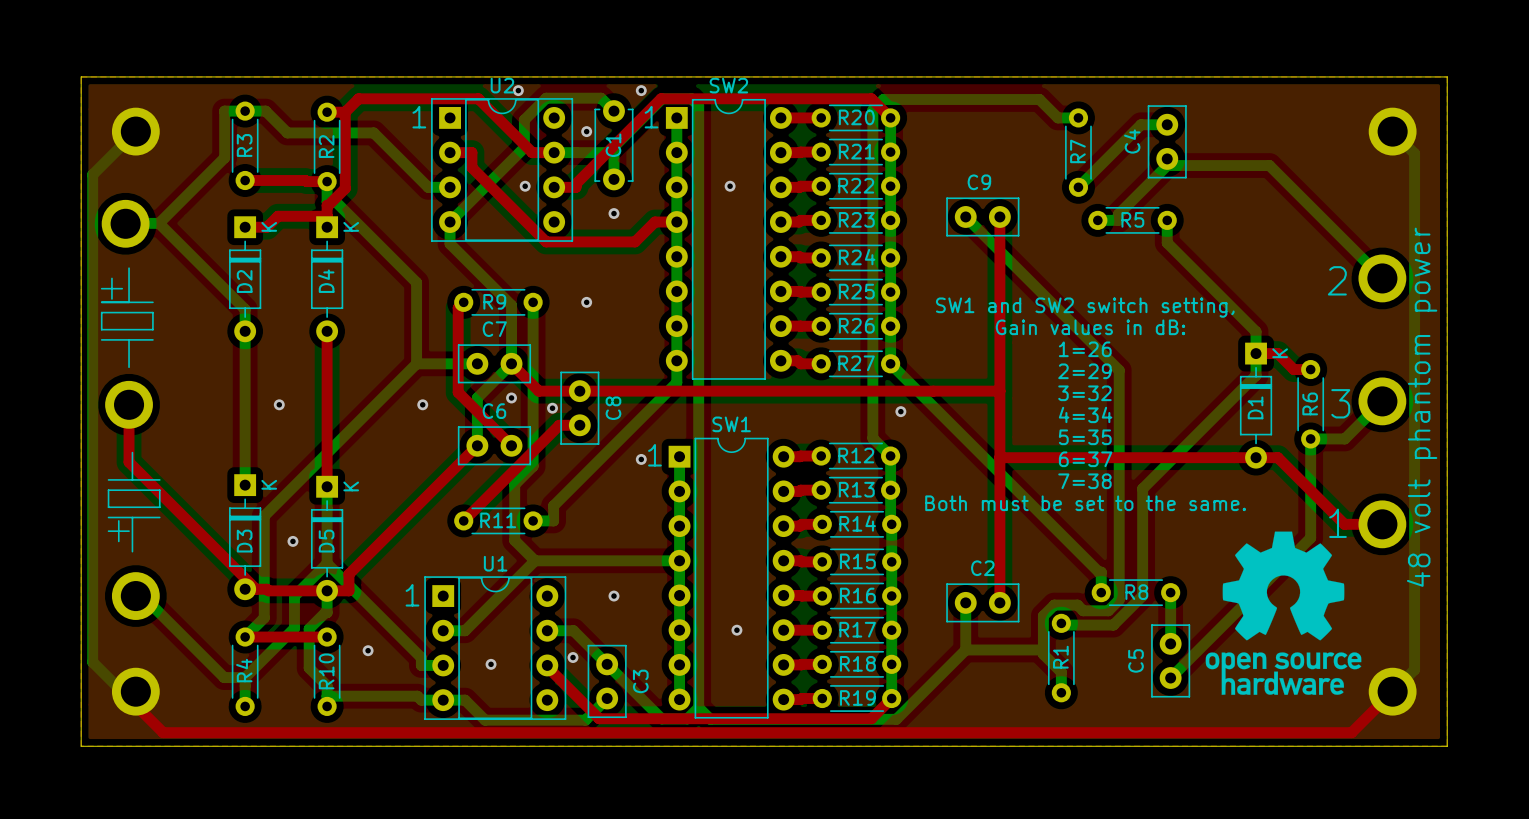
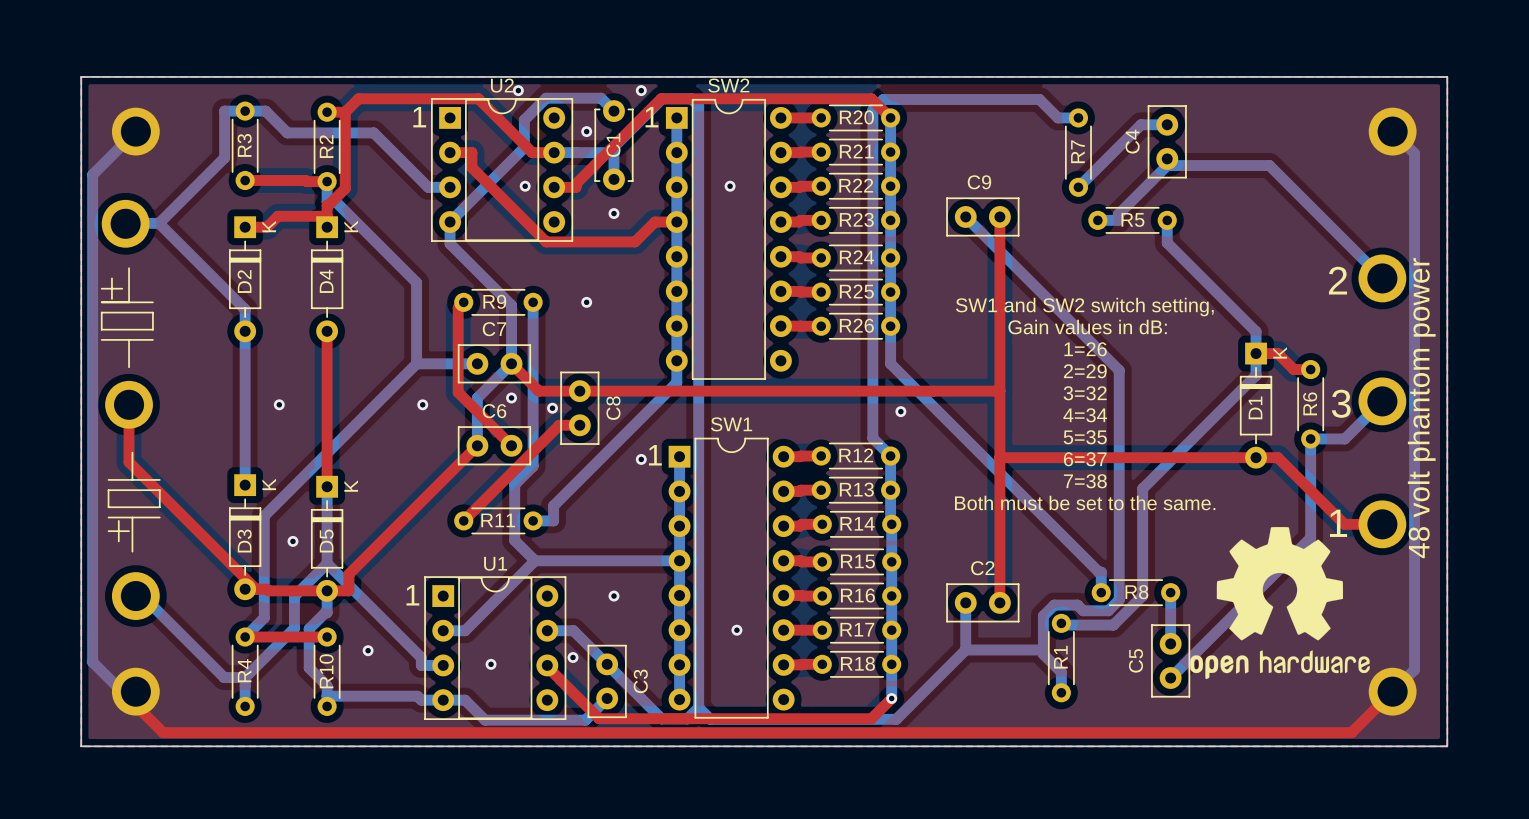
top track: (780, 360) (797, 360) (800, 363) (821, 363) -> none
R27: (855, 363) -> none
drawing shape: [1205, 531, 1362, 695] -> [1190, 527, 1370, 680]
top track: (822, 698) (783, 699) -> none
R19: (857, 698) -> none
via: none -> (891, 698)

